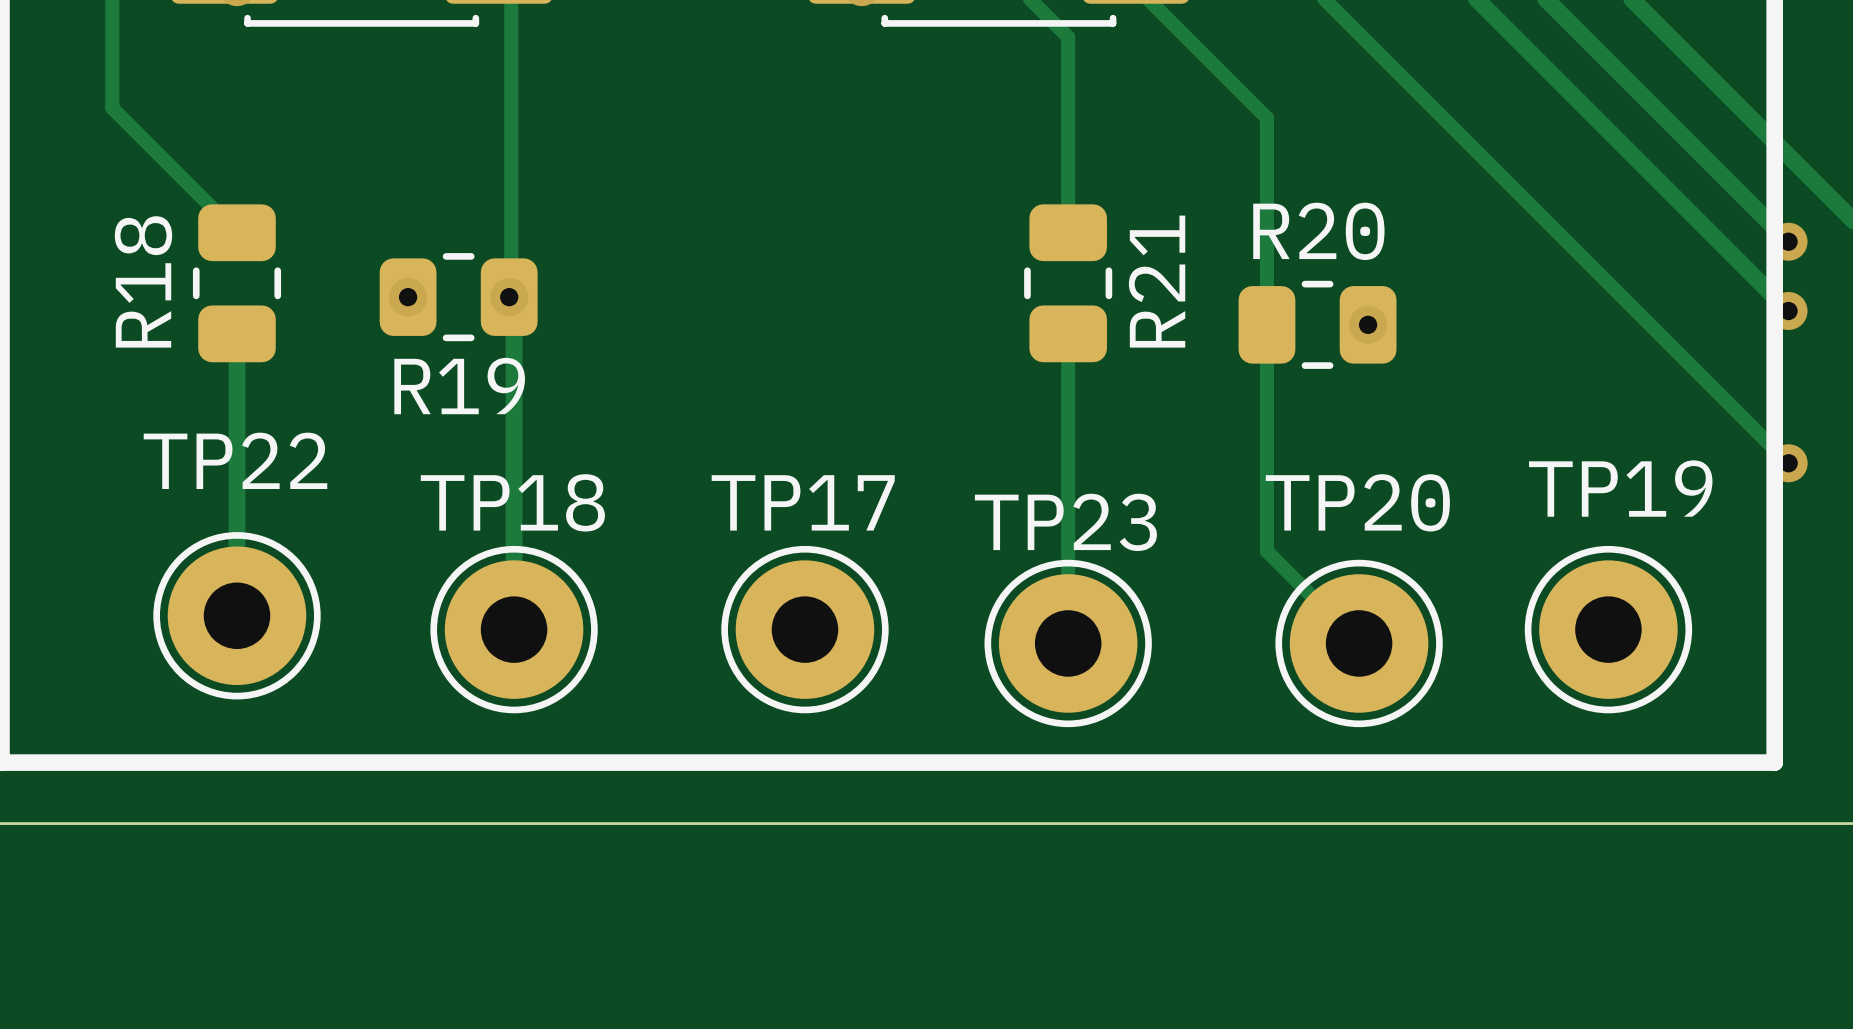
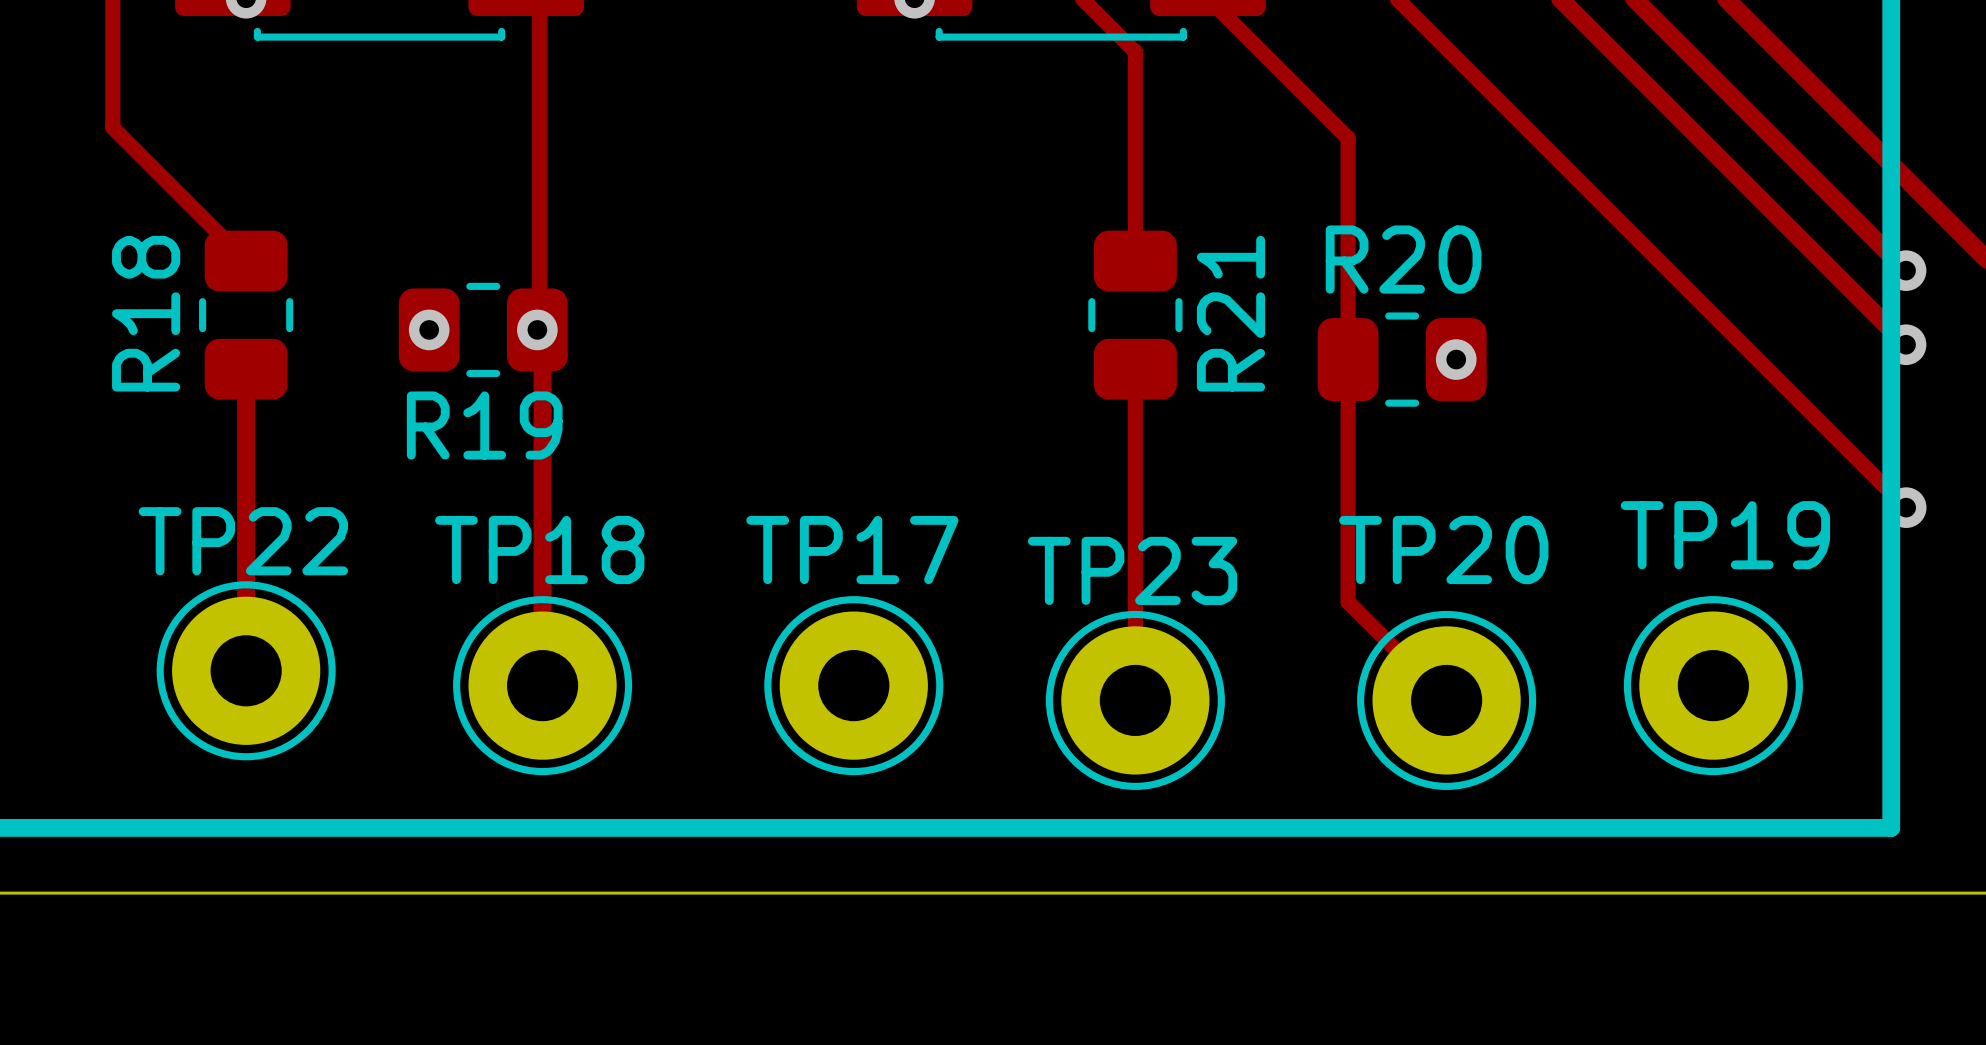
TP22 name position: TP22 (235, 460) -> TP22 (243, 541)

